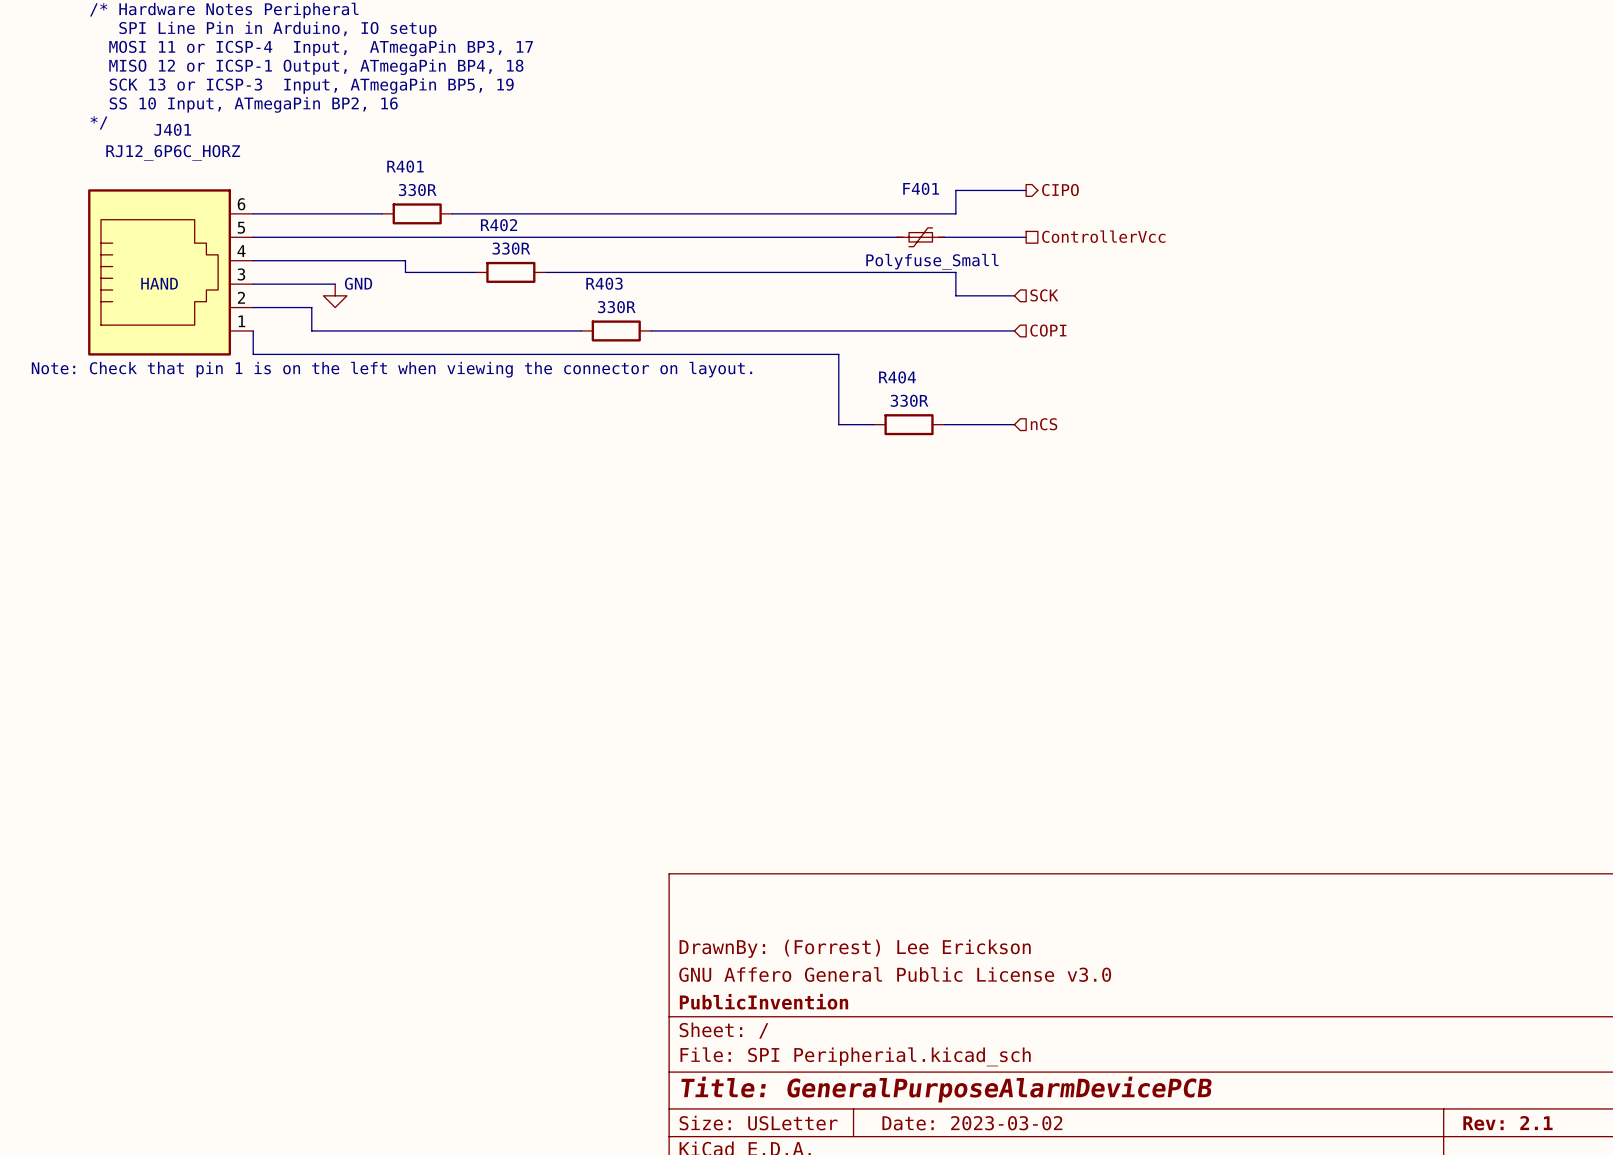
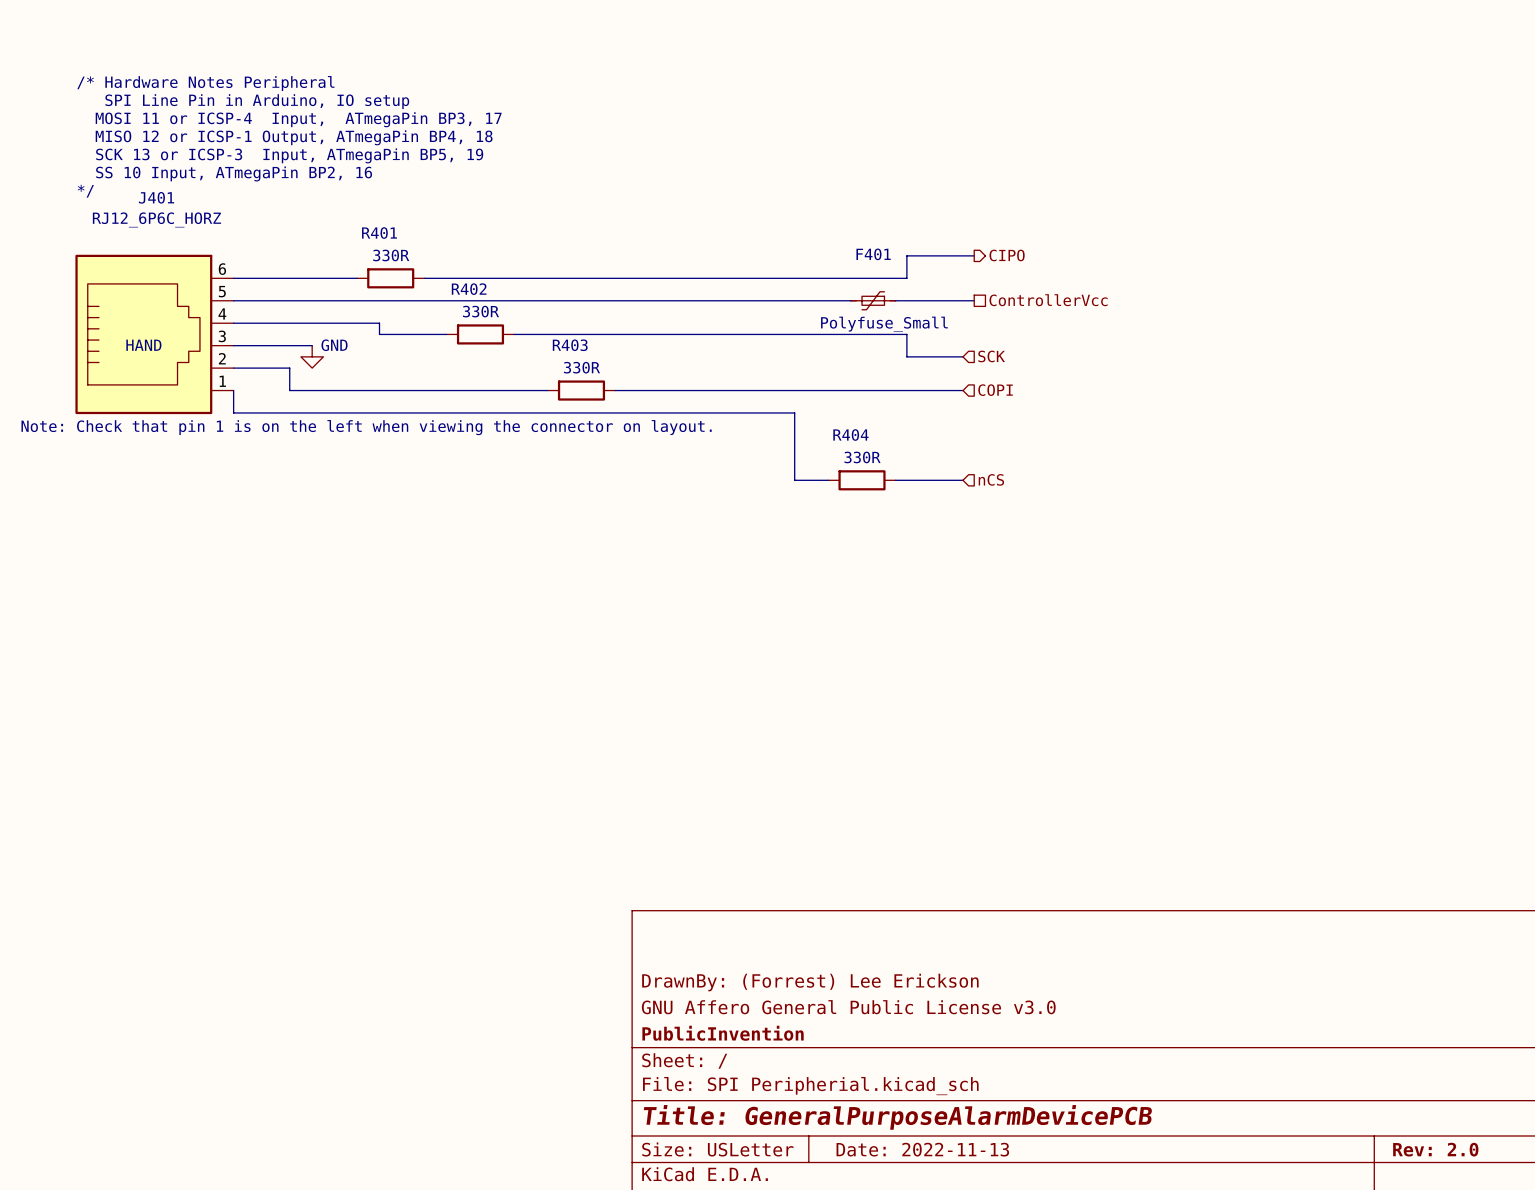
title block: Date: 2023-03-02 (972, 1123) -> Date: 2022-11-13 (922, 1149)
title block: Rev: 2.1 (1507, 1123) -> Rev: 2.0 (1435, 1149)

